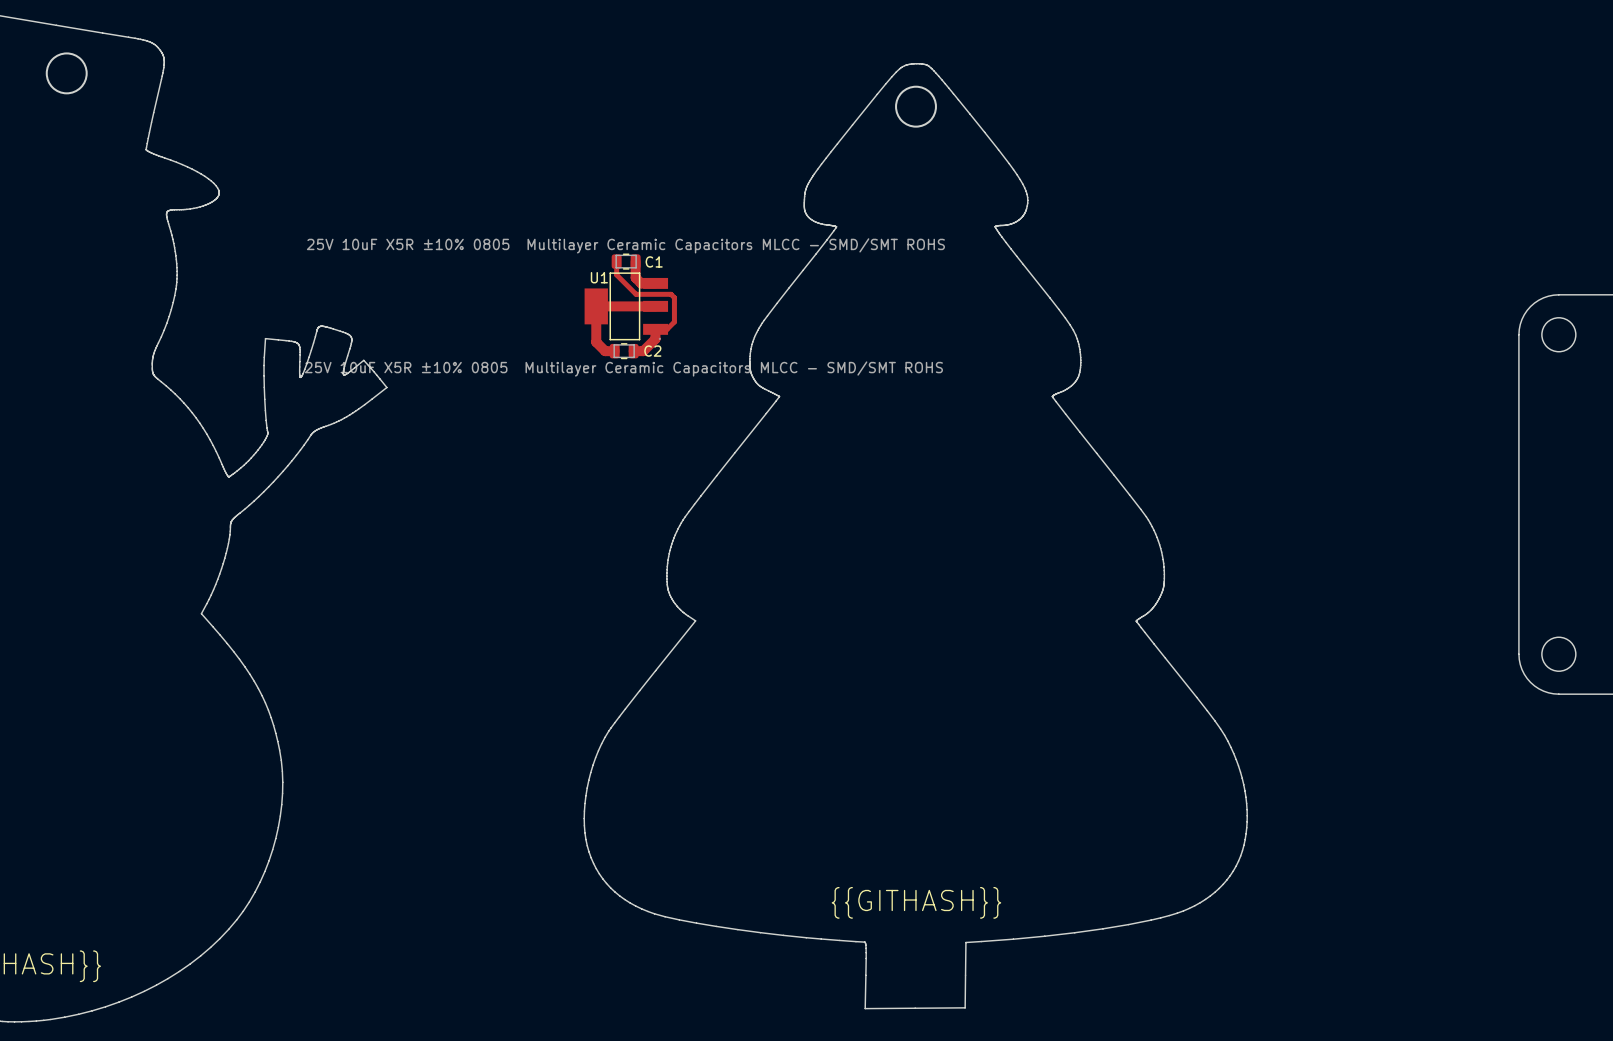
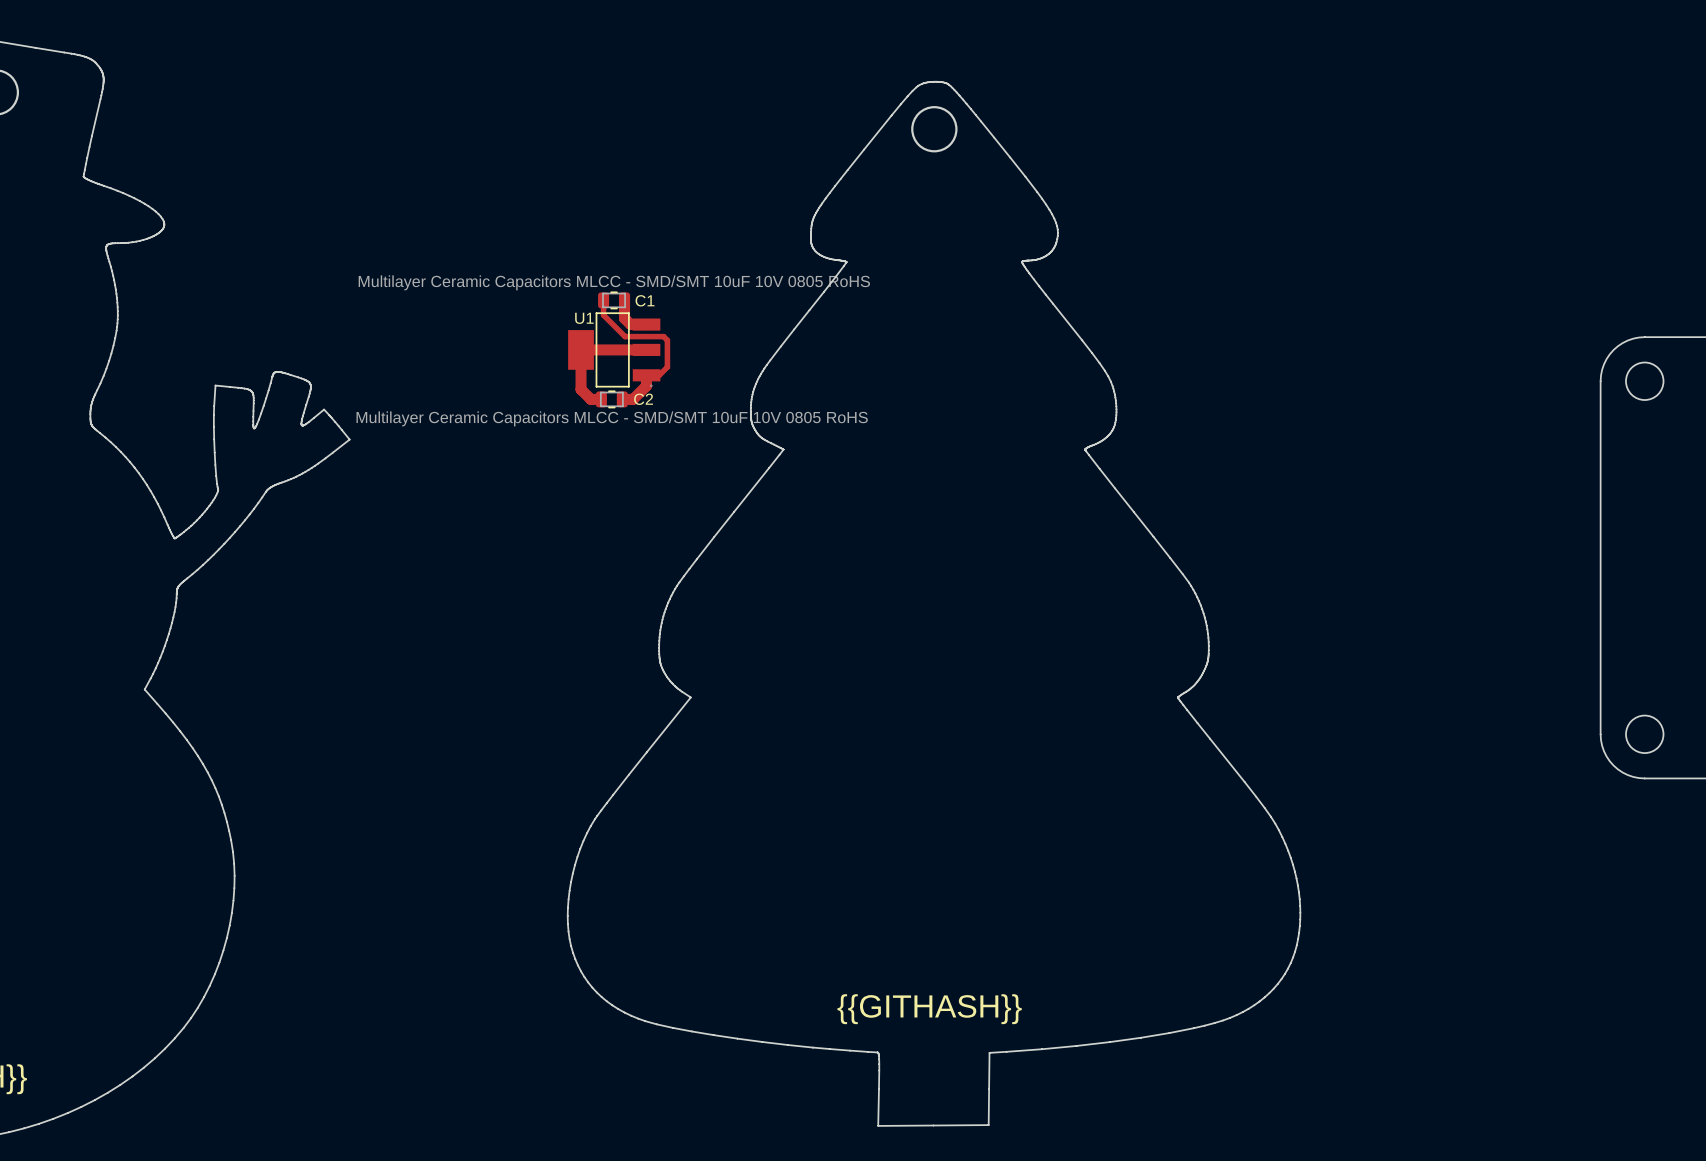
C1 value: 25V 10uF X5R ±10% 0805 Multilayer Ceramic Capacitors MLCC - SMD/SMT ROHS (625, 245) -> Multilayer Ceramic Capacitors MLCC - SMD/SMT 10uF 10V 0805 RoHS (614, 282)
C2 value: 25V 10uF X5R ±10% 0805 Multilayer Ceramic Capacitors MLCC - SMD/SMT ROHS (623, 368) -> Multilayer Ceramic Capacitors MLCC - SMD/SMT 10uF 10V 0805 RoHS (612, 418)

